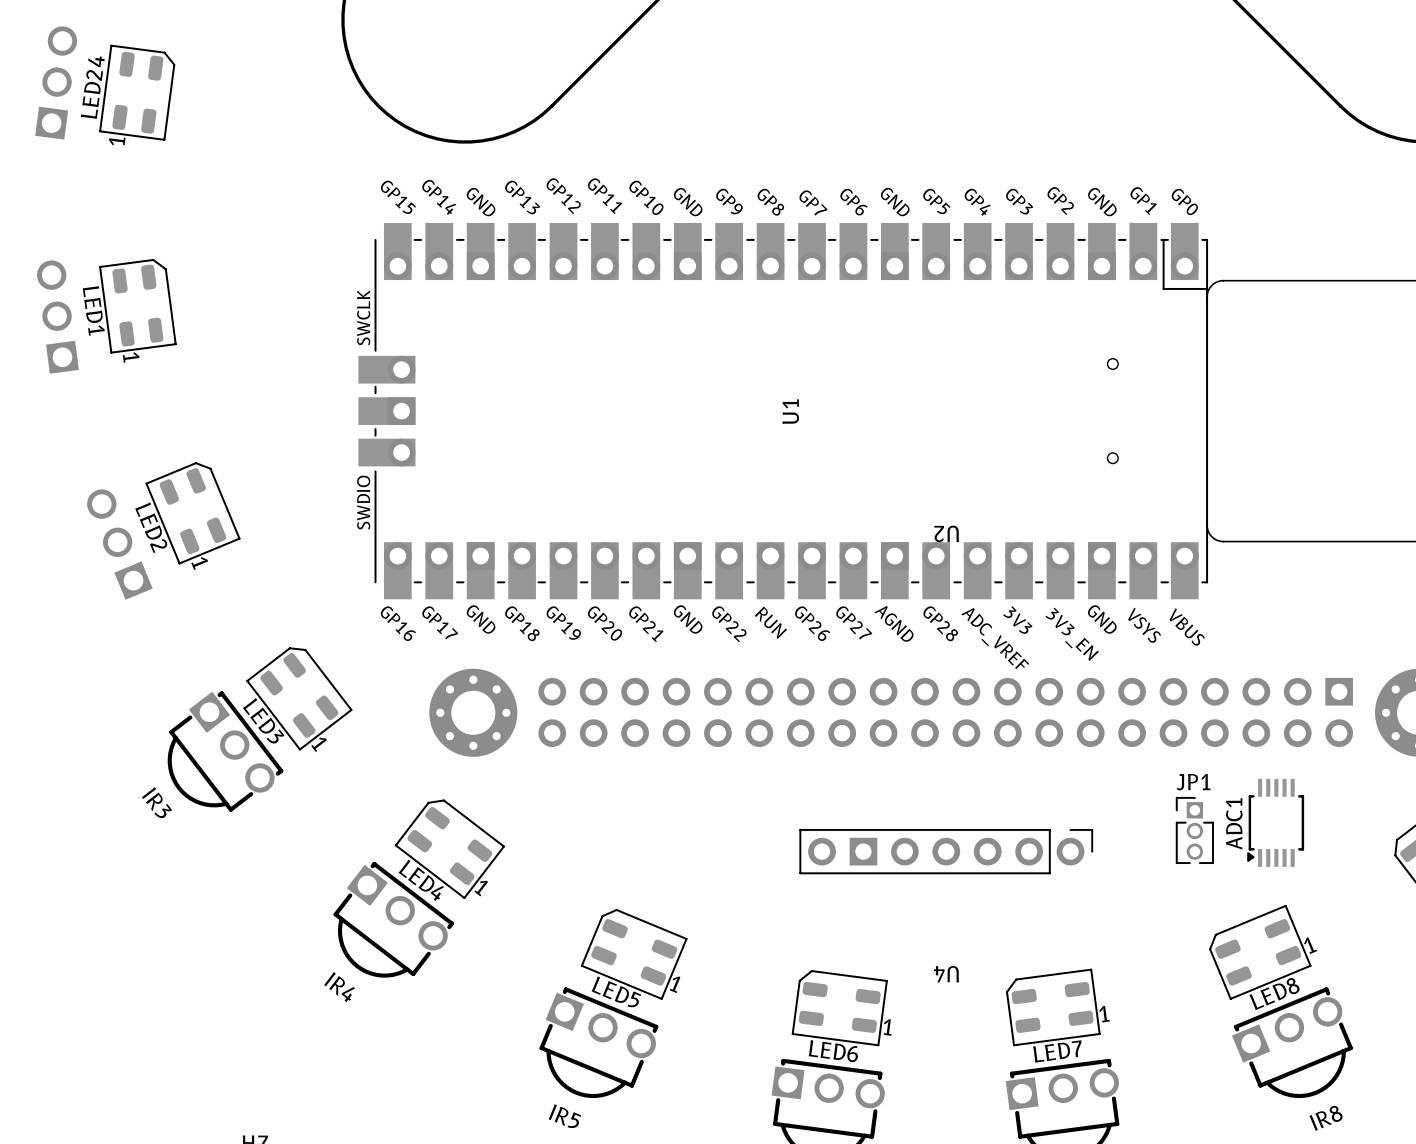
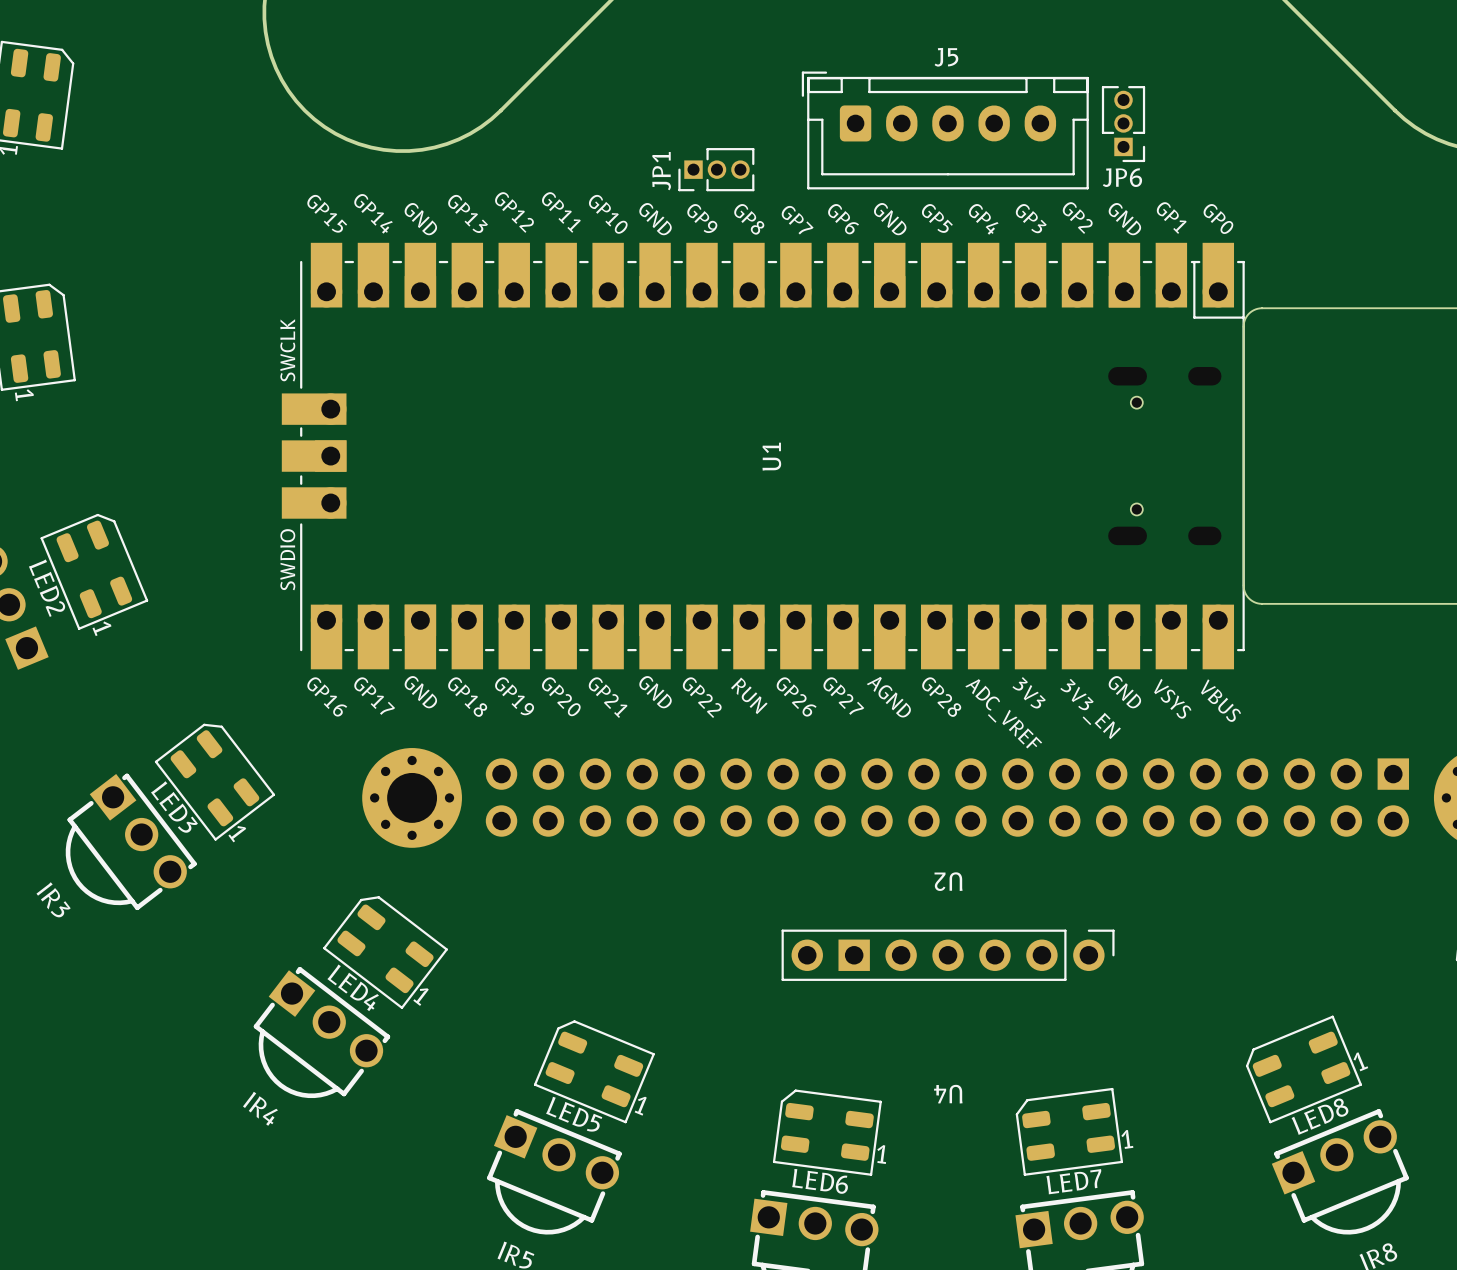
JP6: none -> (1123, 124)
J5: none -> (945, 130)
U2 name position: U2 (946, 533) -> U2 (948, 881)
ADC1: (1275, 822) -> none
JP1 rotation: 0° (1194, 830) -> 90° counterclockwise (716, 169)
JP1 position: (1194, 830) -> (716, 169)

